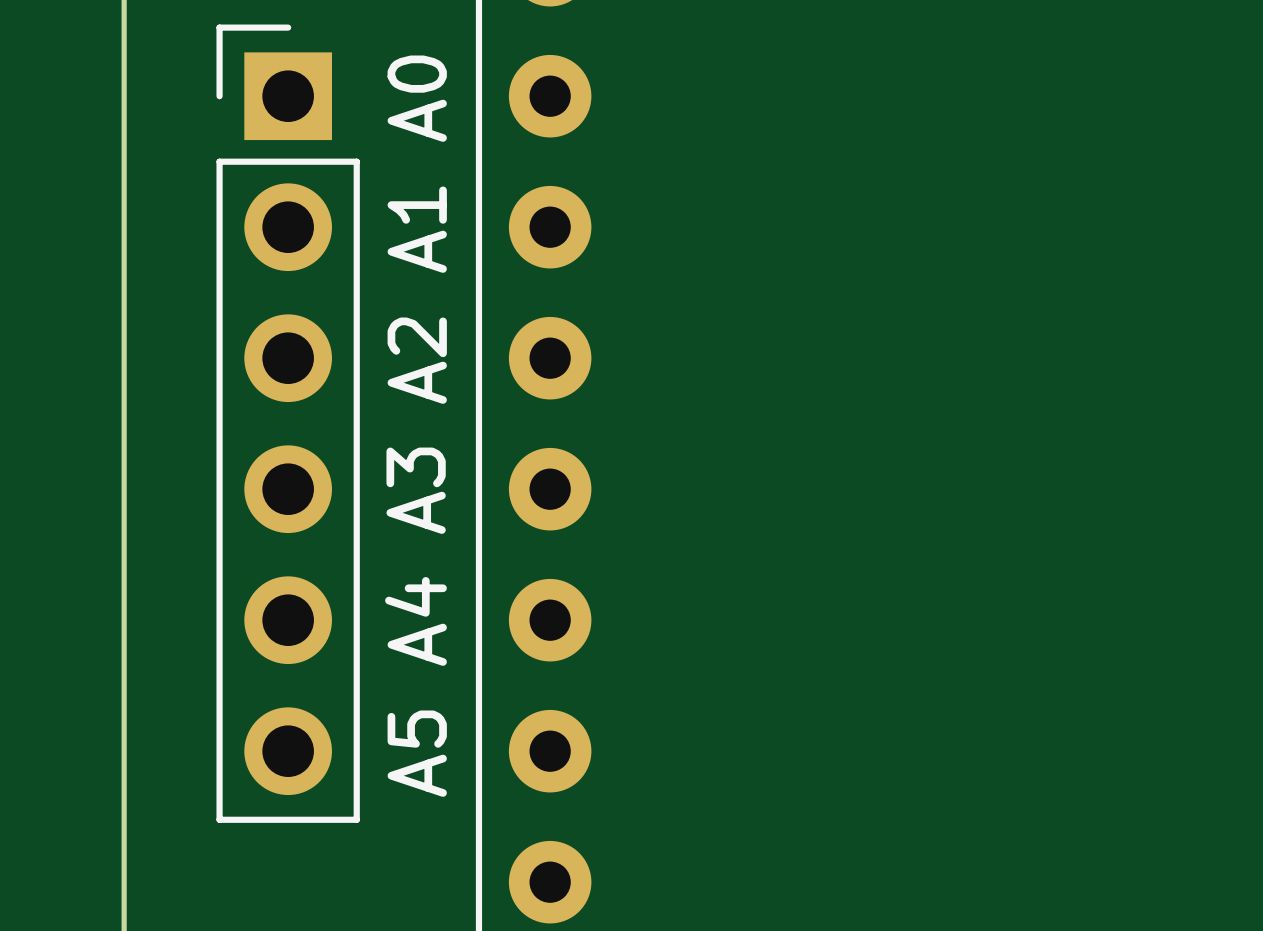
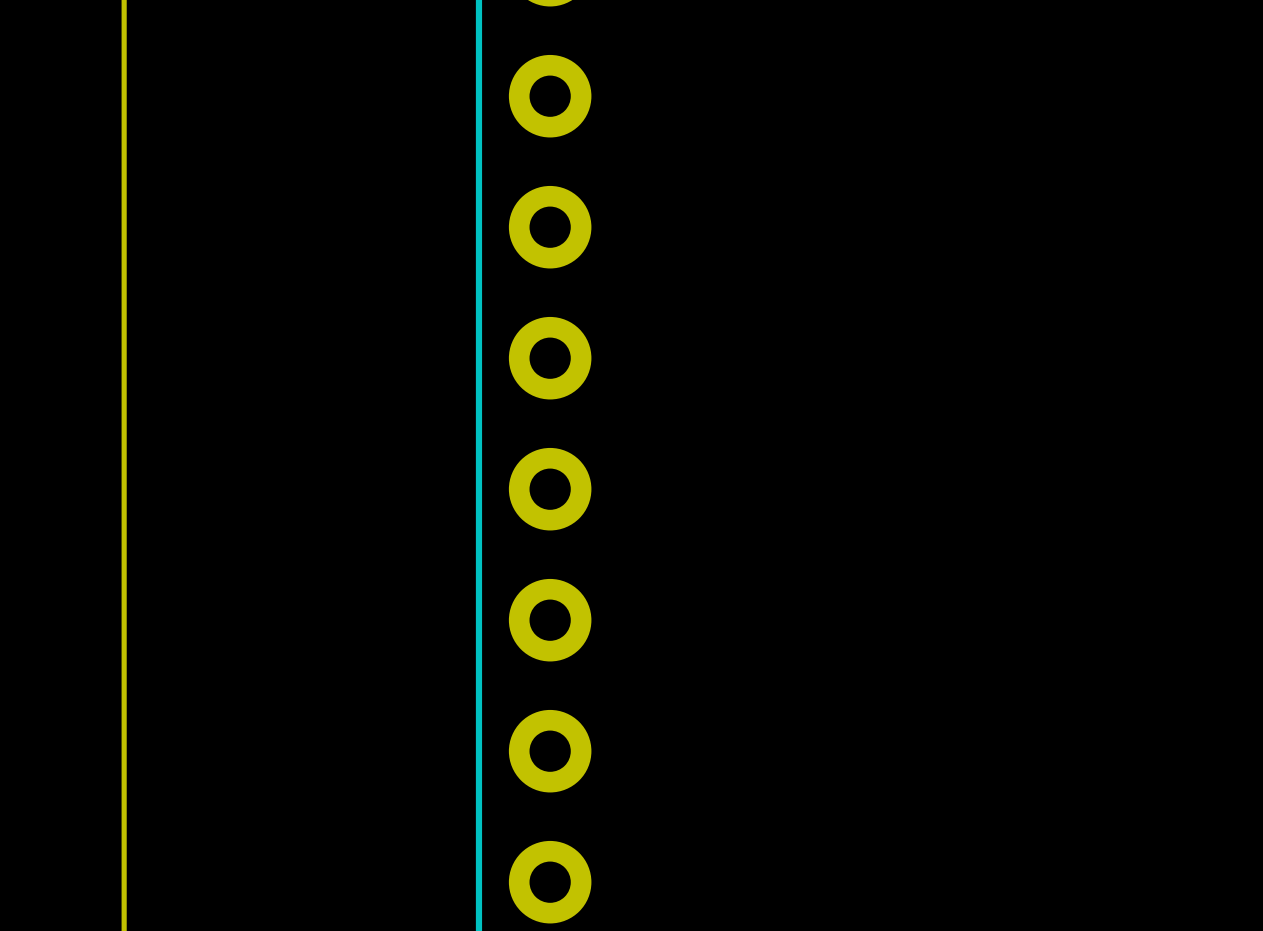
text: A0 (417, 98) -> none
text: A1 (417, 229) -> none
text: A2 (417, 360) -> none
part: (288, 423) -> none
text: A3 (416, 490) -> none
text: A4 (416, 621) -> none
text: A5 (417, 753) -> none

